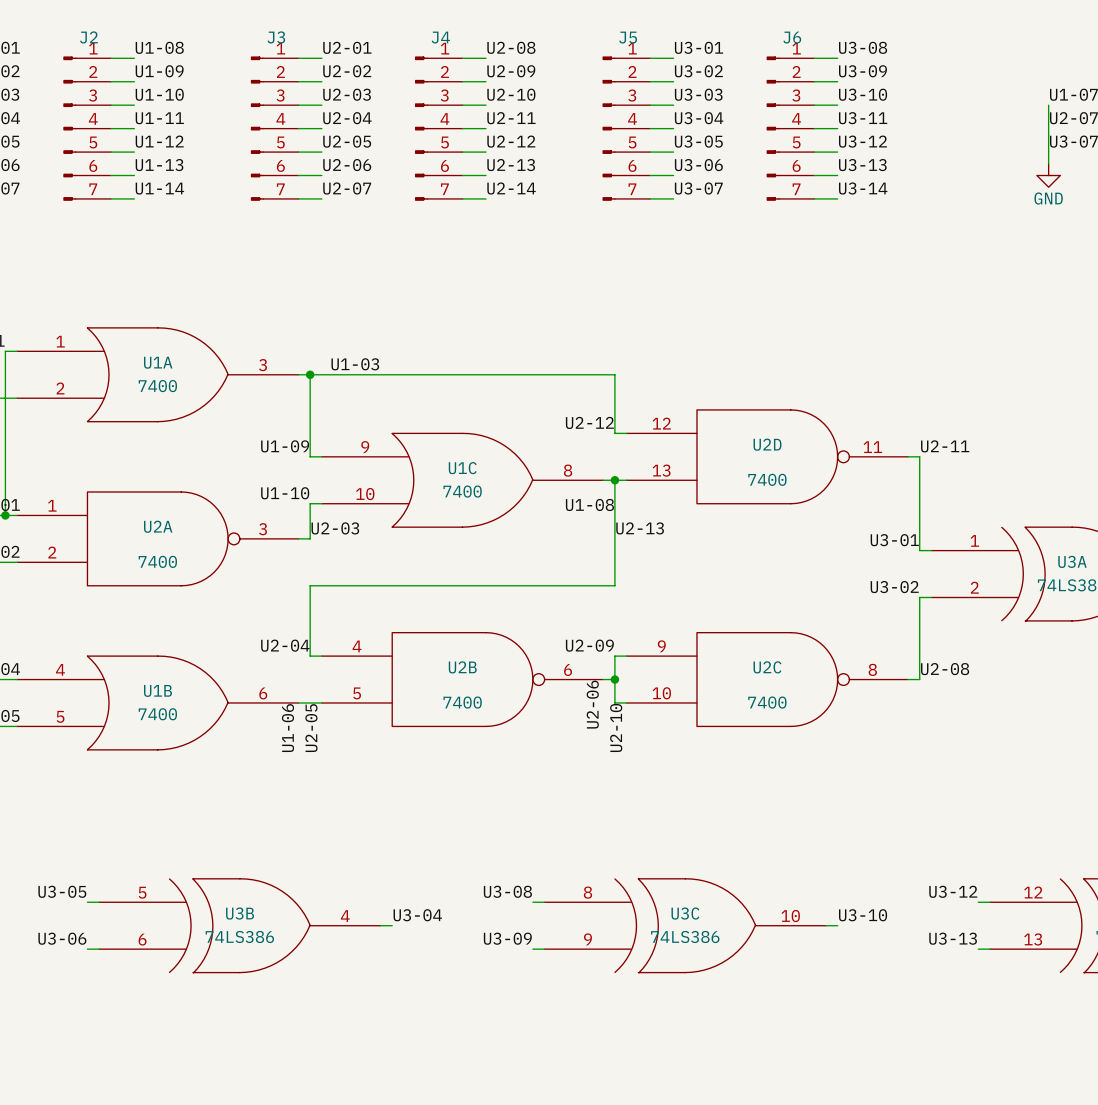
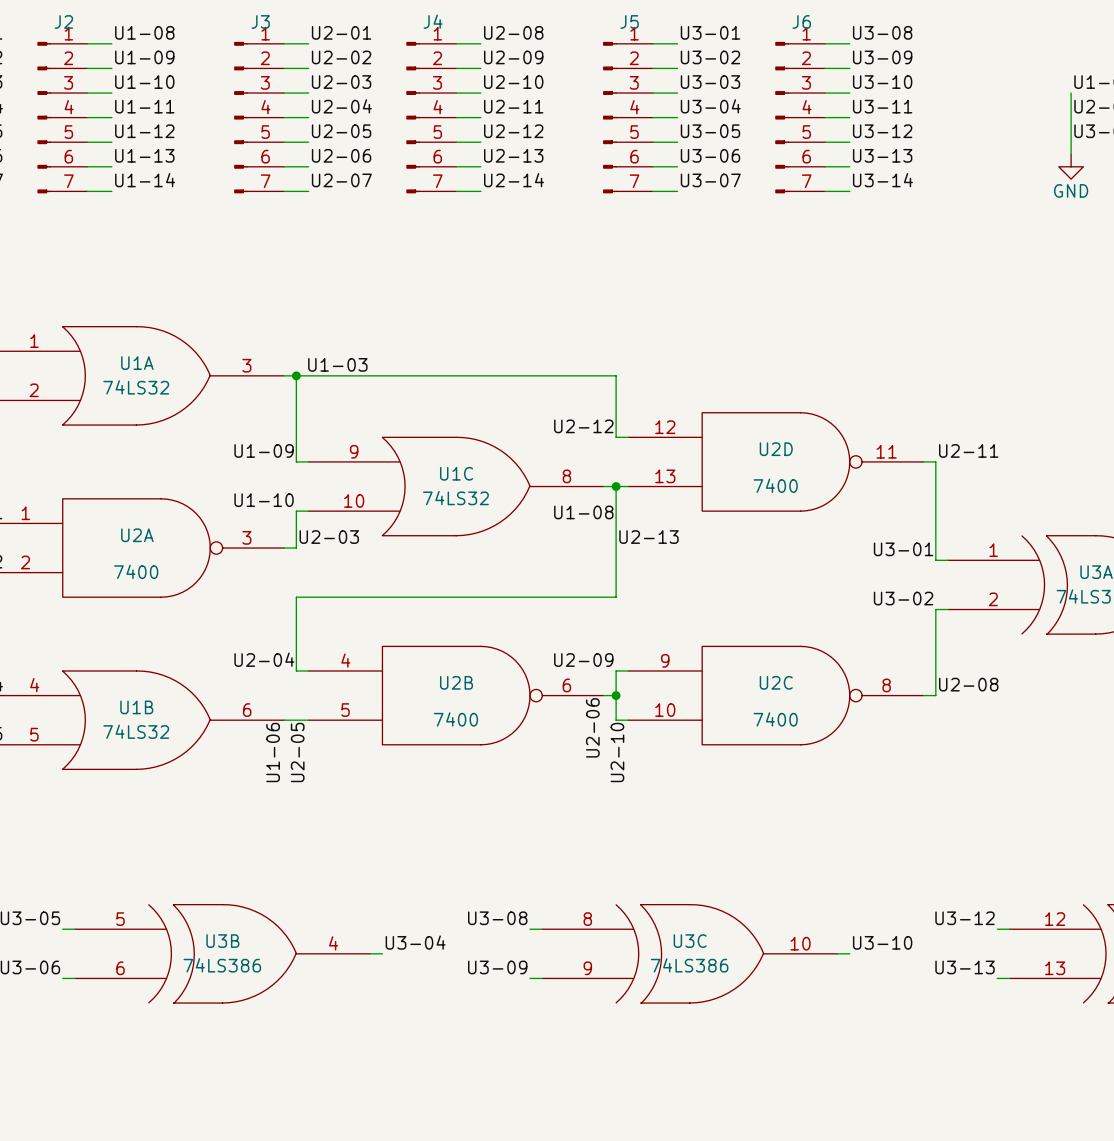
U1A value: 7400 (157, 386) -> 74LS32 (136, 387)
U1C value: 7400 (462, 491) -> 74LS32 (455, 498)
U1B value: 7400 (157, 714) -> 74LS32 (136, 731)

